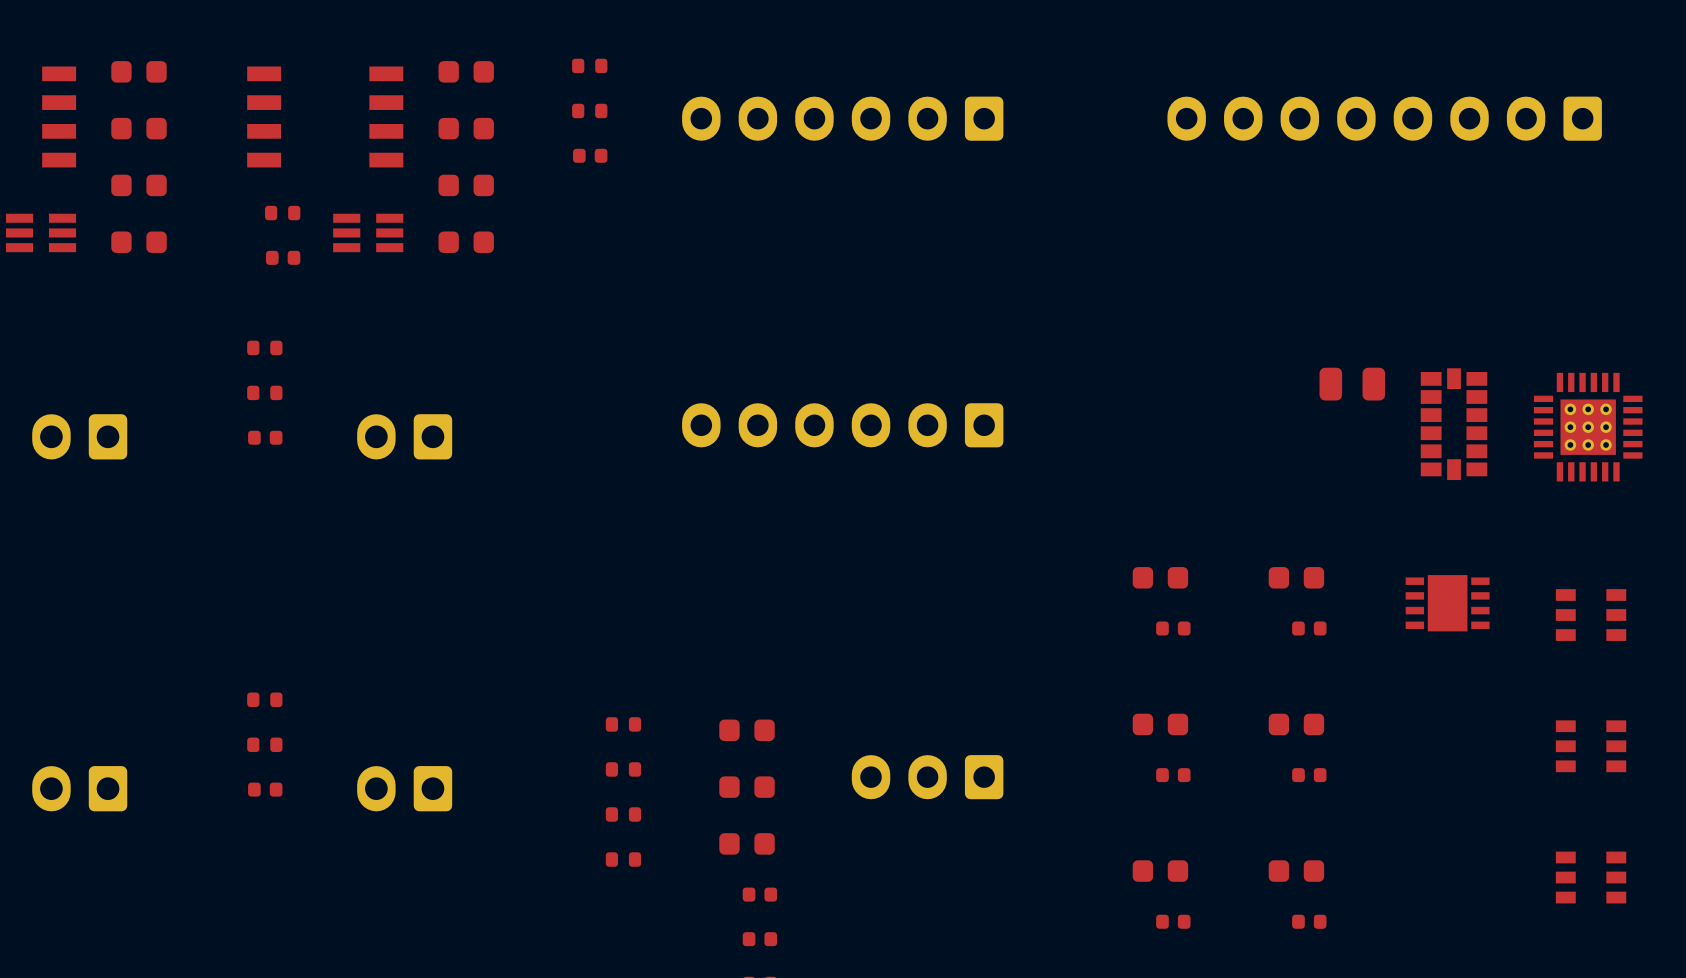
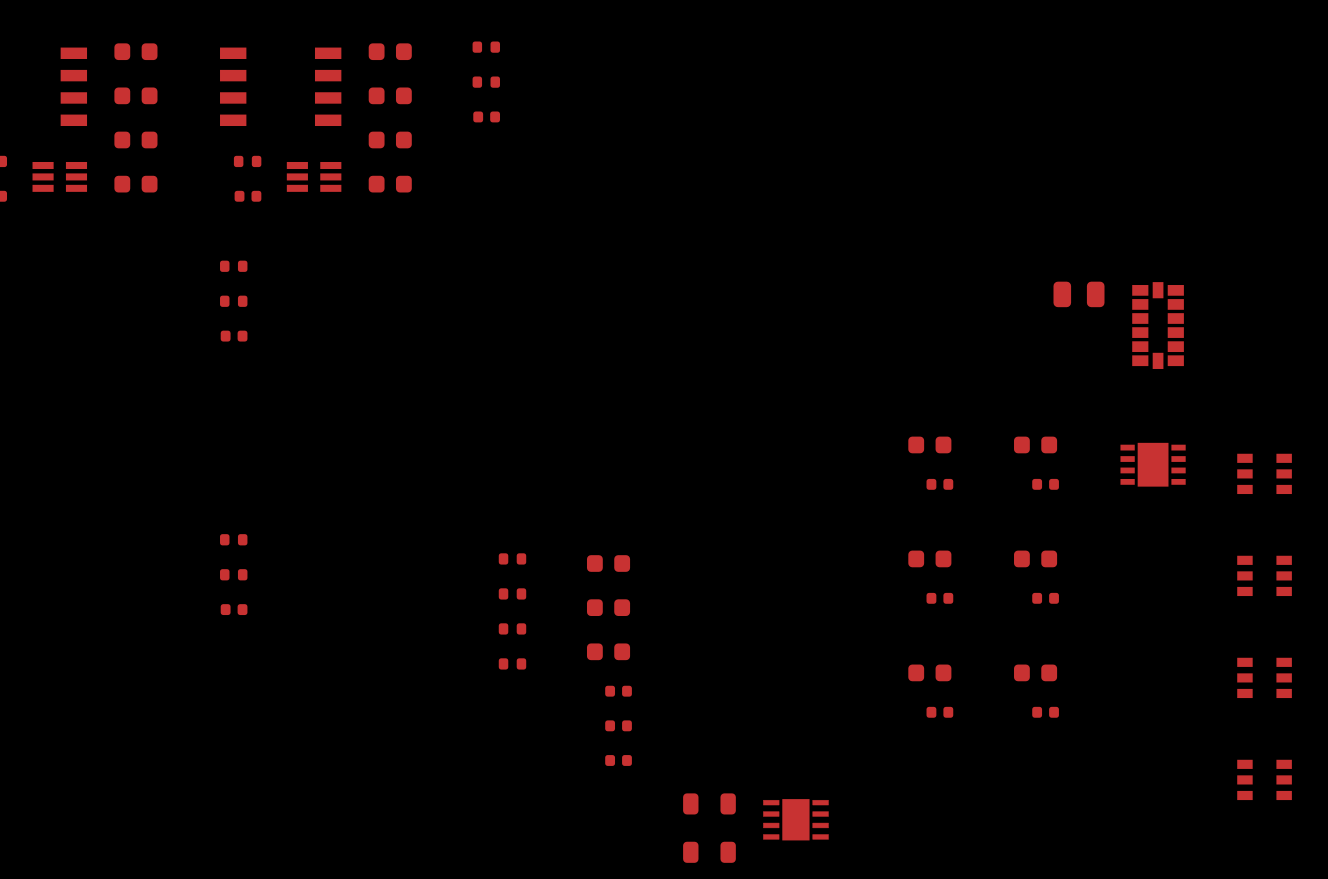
part: (842, 118) -> none
part: (1384, 118) -> none
part: (842, 425) -> none
part: (1588, 427) -> none
part: (79, 436) -> none
part: (404, 436) -> none
part: (927, 777) -> none
part: (79, 788) -> none
part: (404, 788) -> none

